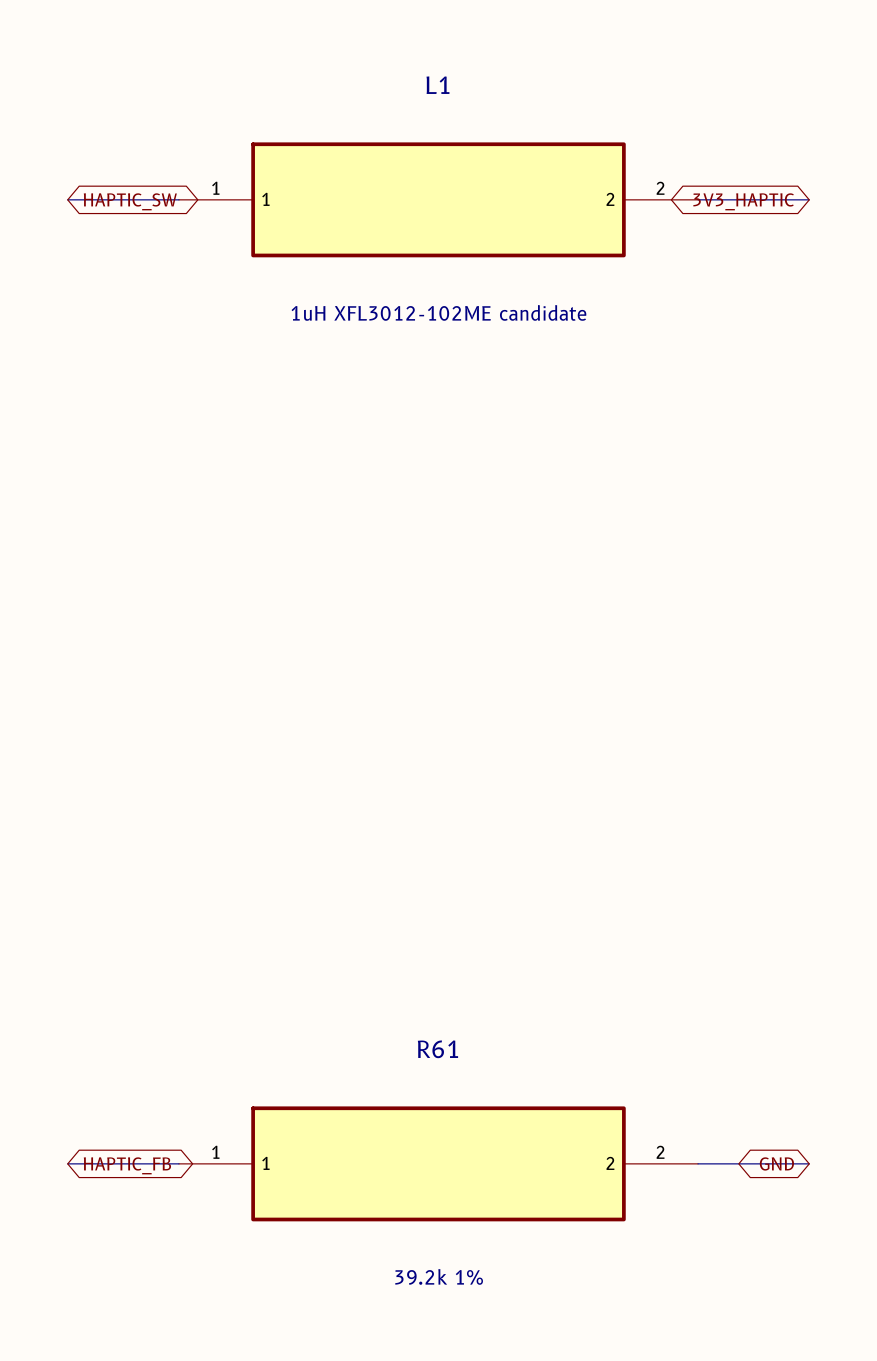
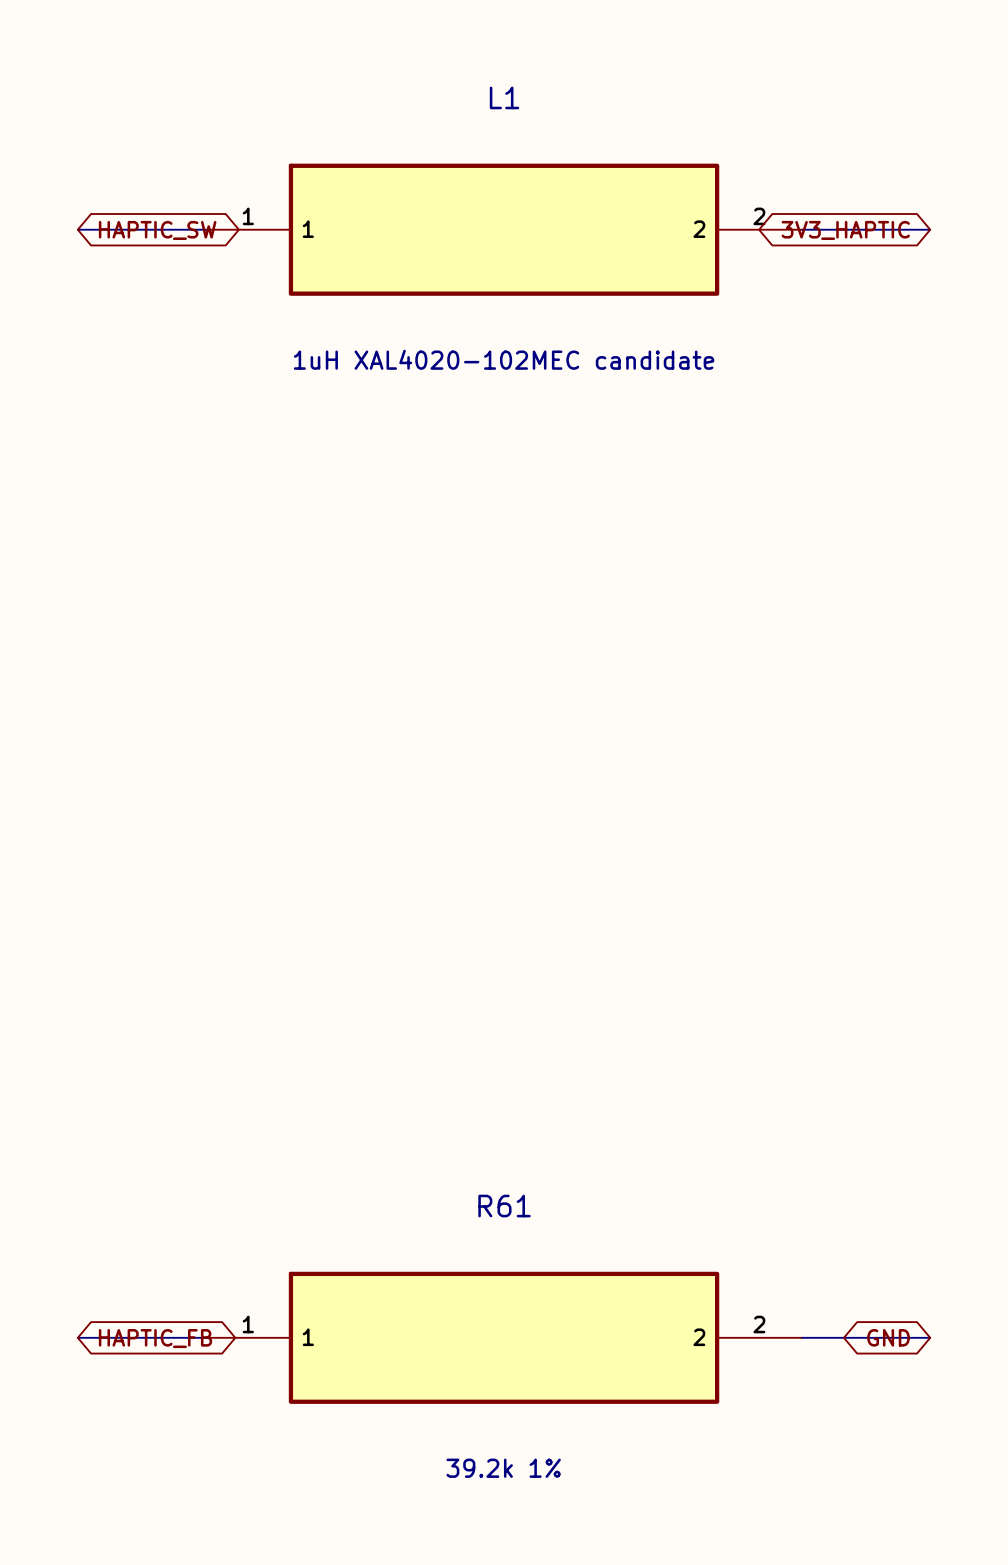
L1 value: 1uH XFL3012-102ME candidate (438, 312) -> 1uH XAL4020-102MEC candidate (504, 359)

